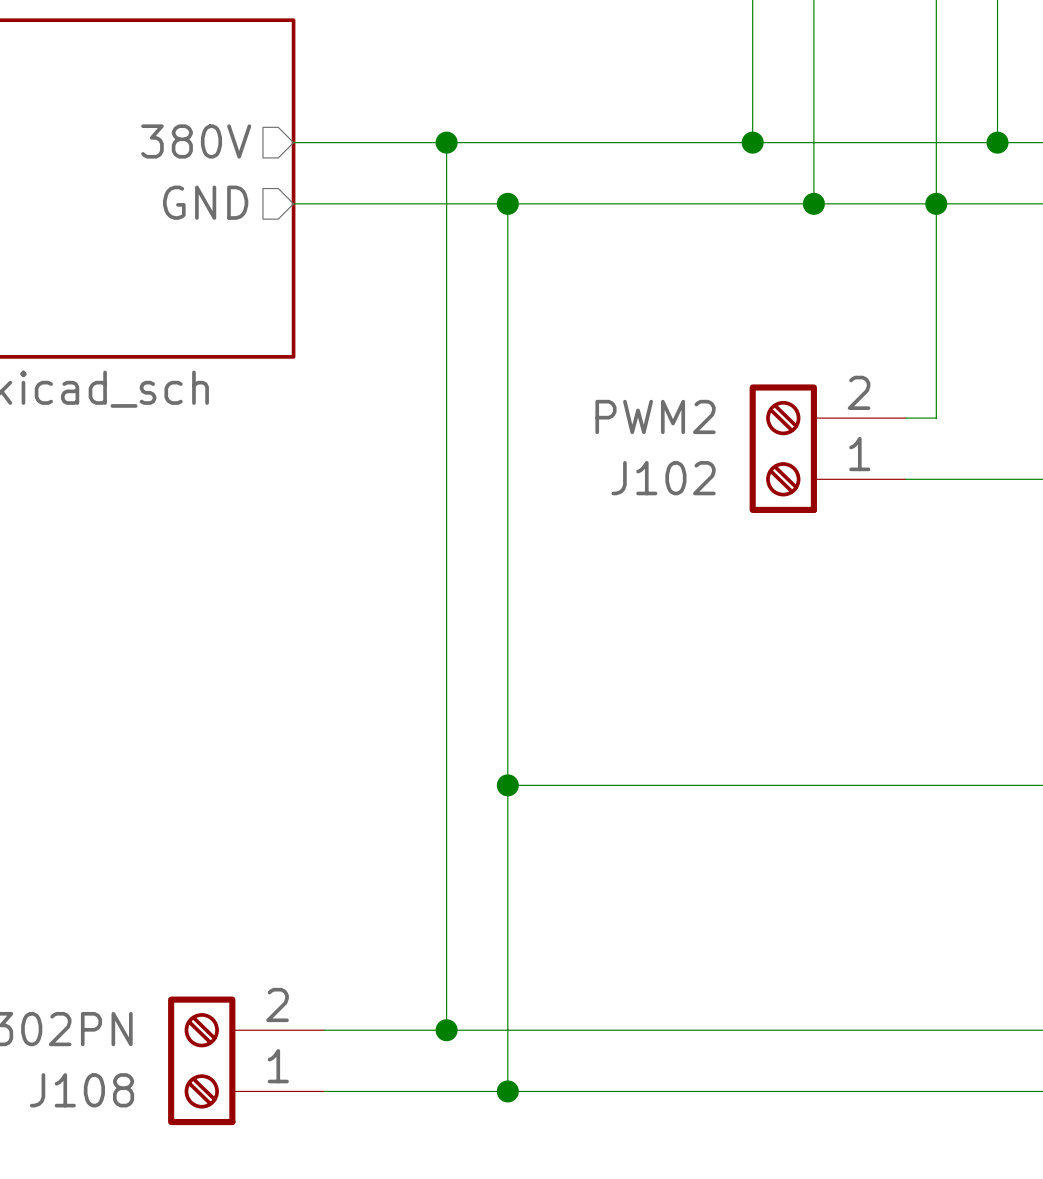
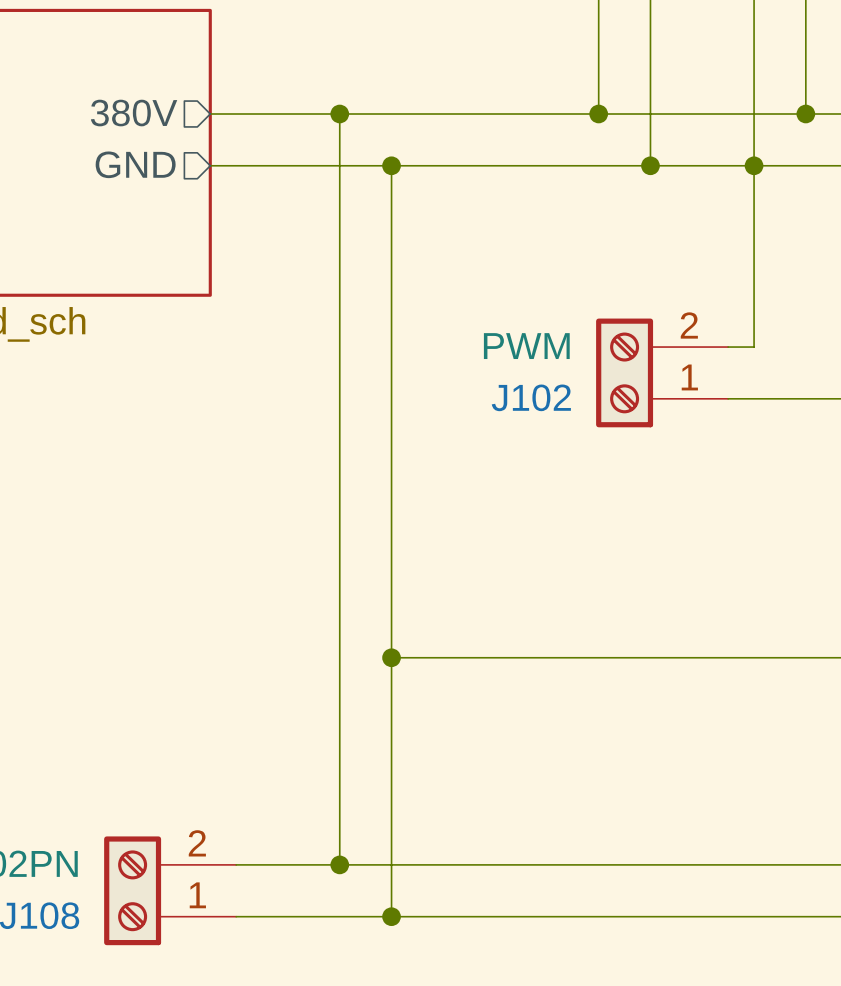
J102 value: PWM2 (655, 416) -> PWM (526, 346)

